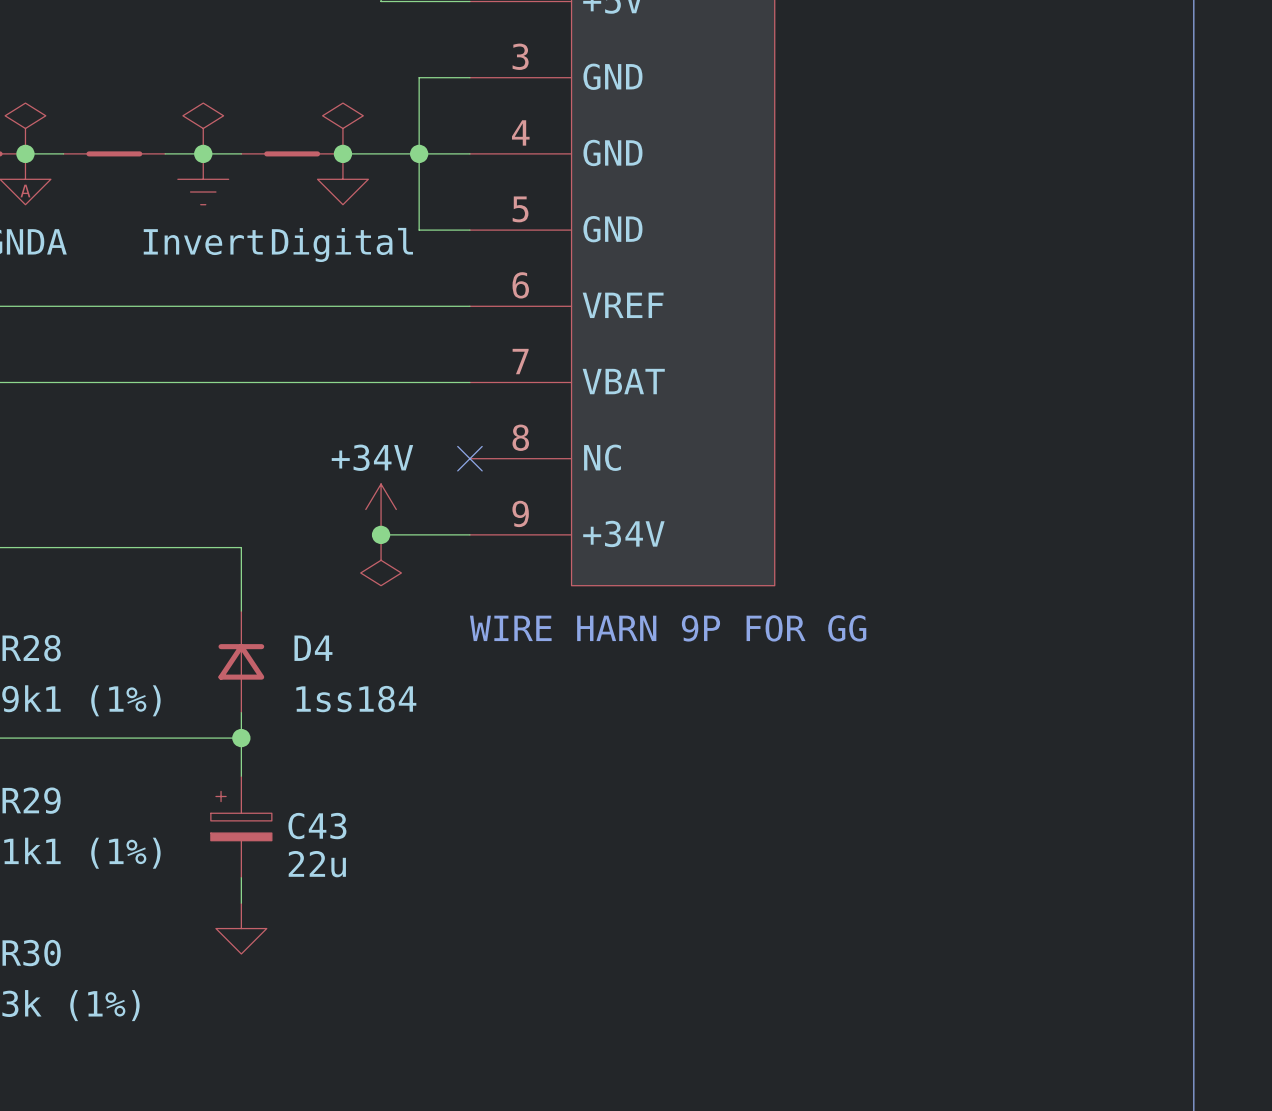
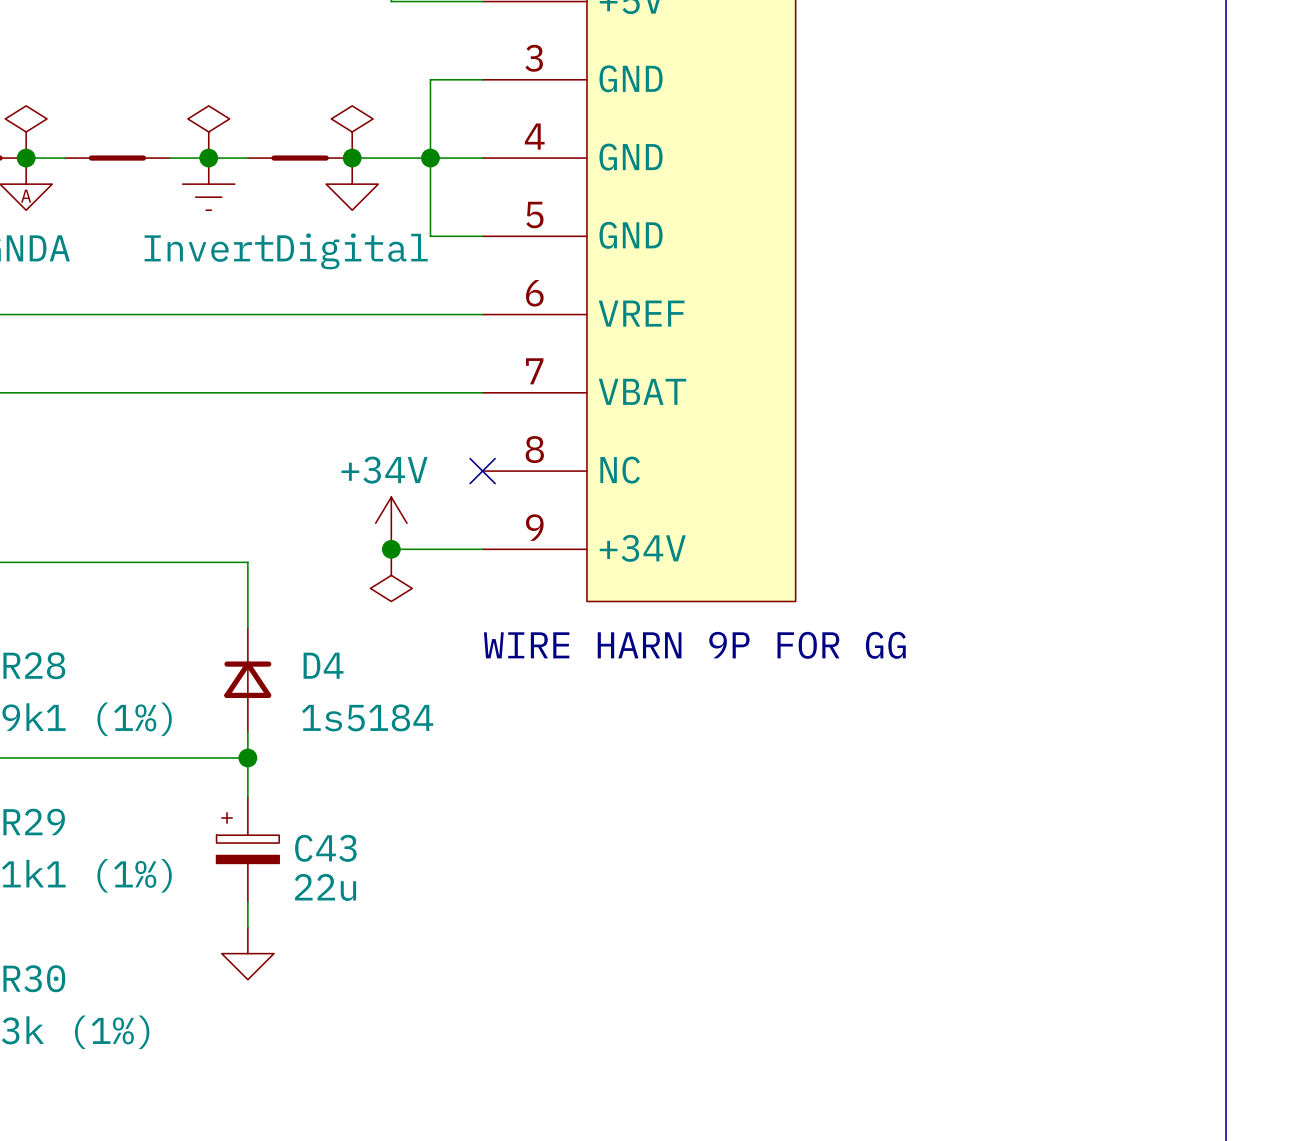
D4 value: 1ss184 (356, 699) -> 1s5184 (367, 717)

